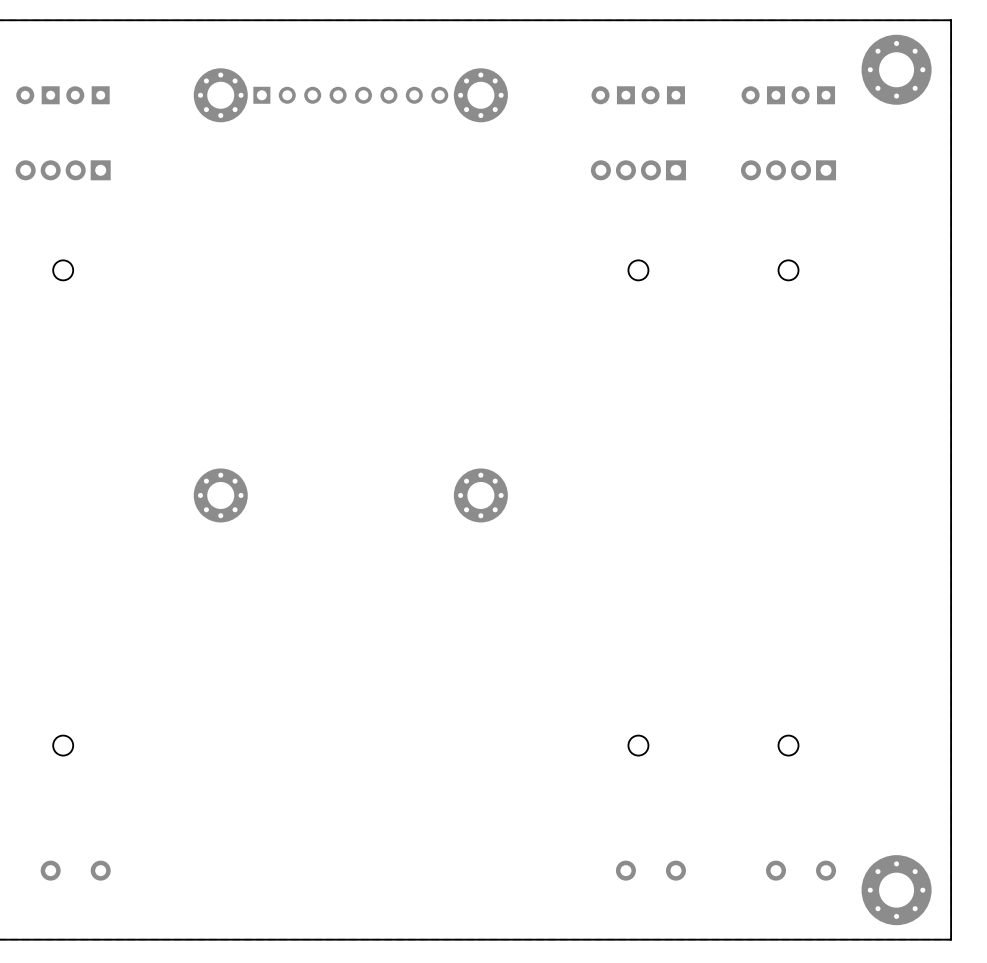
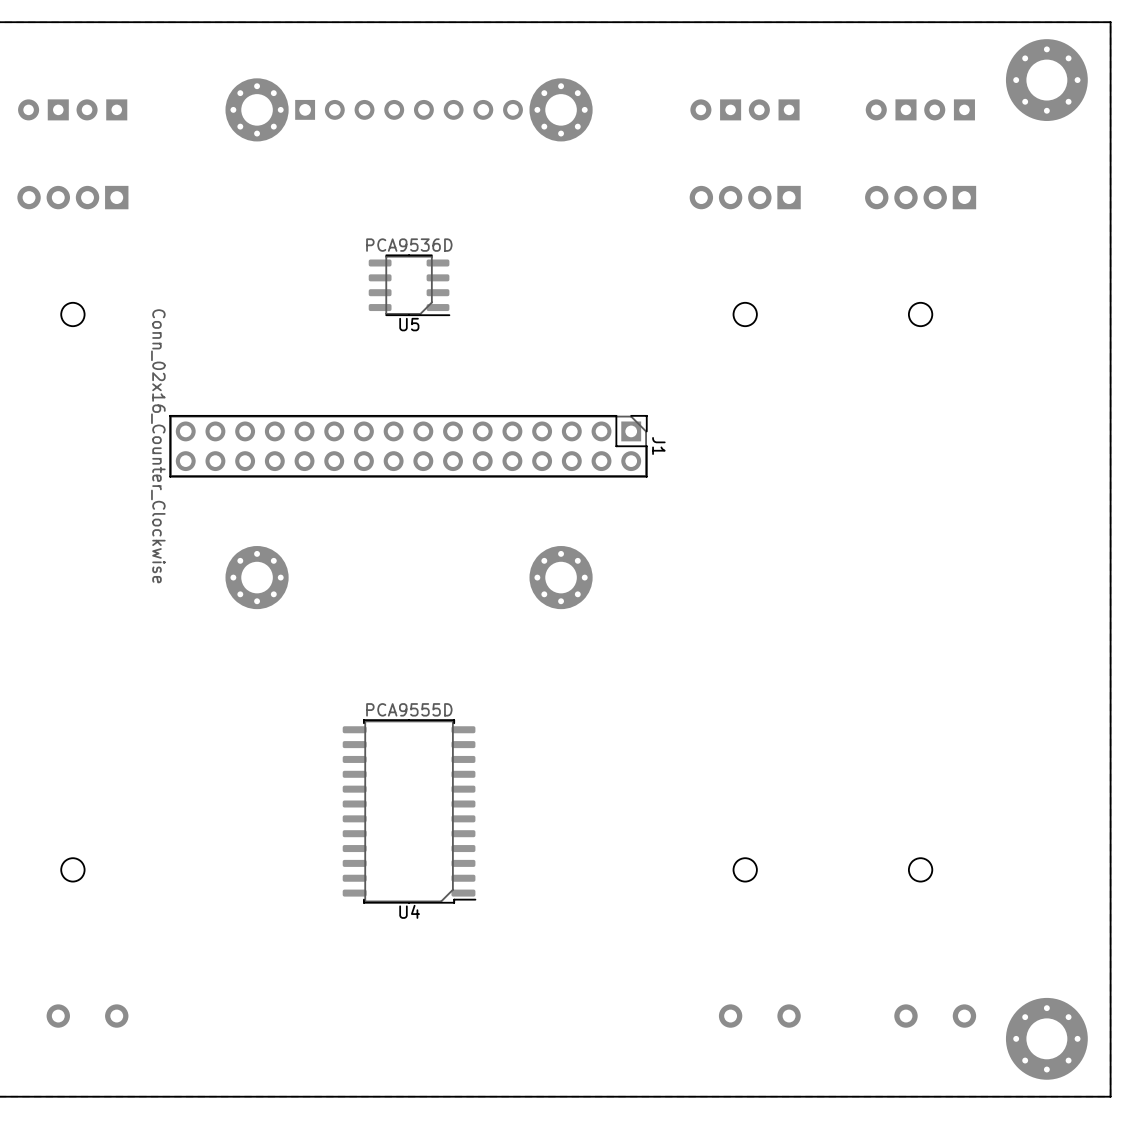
U5: none -> PCA9536D (409, 285)
J1: none -> Conn_02x16_Counter_Clockwise (408, 446)
U4: none -> PCA9555D (409, 811)

